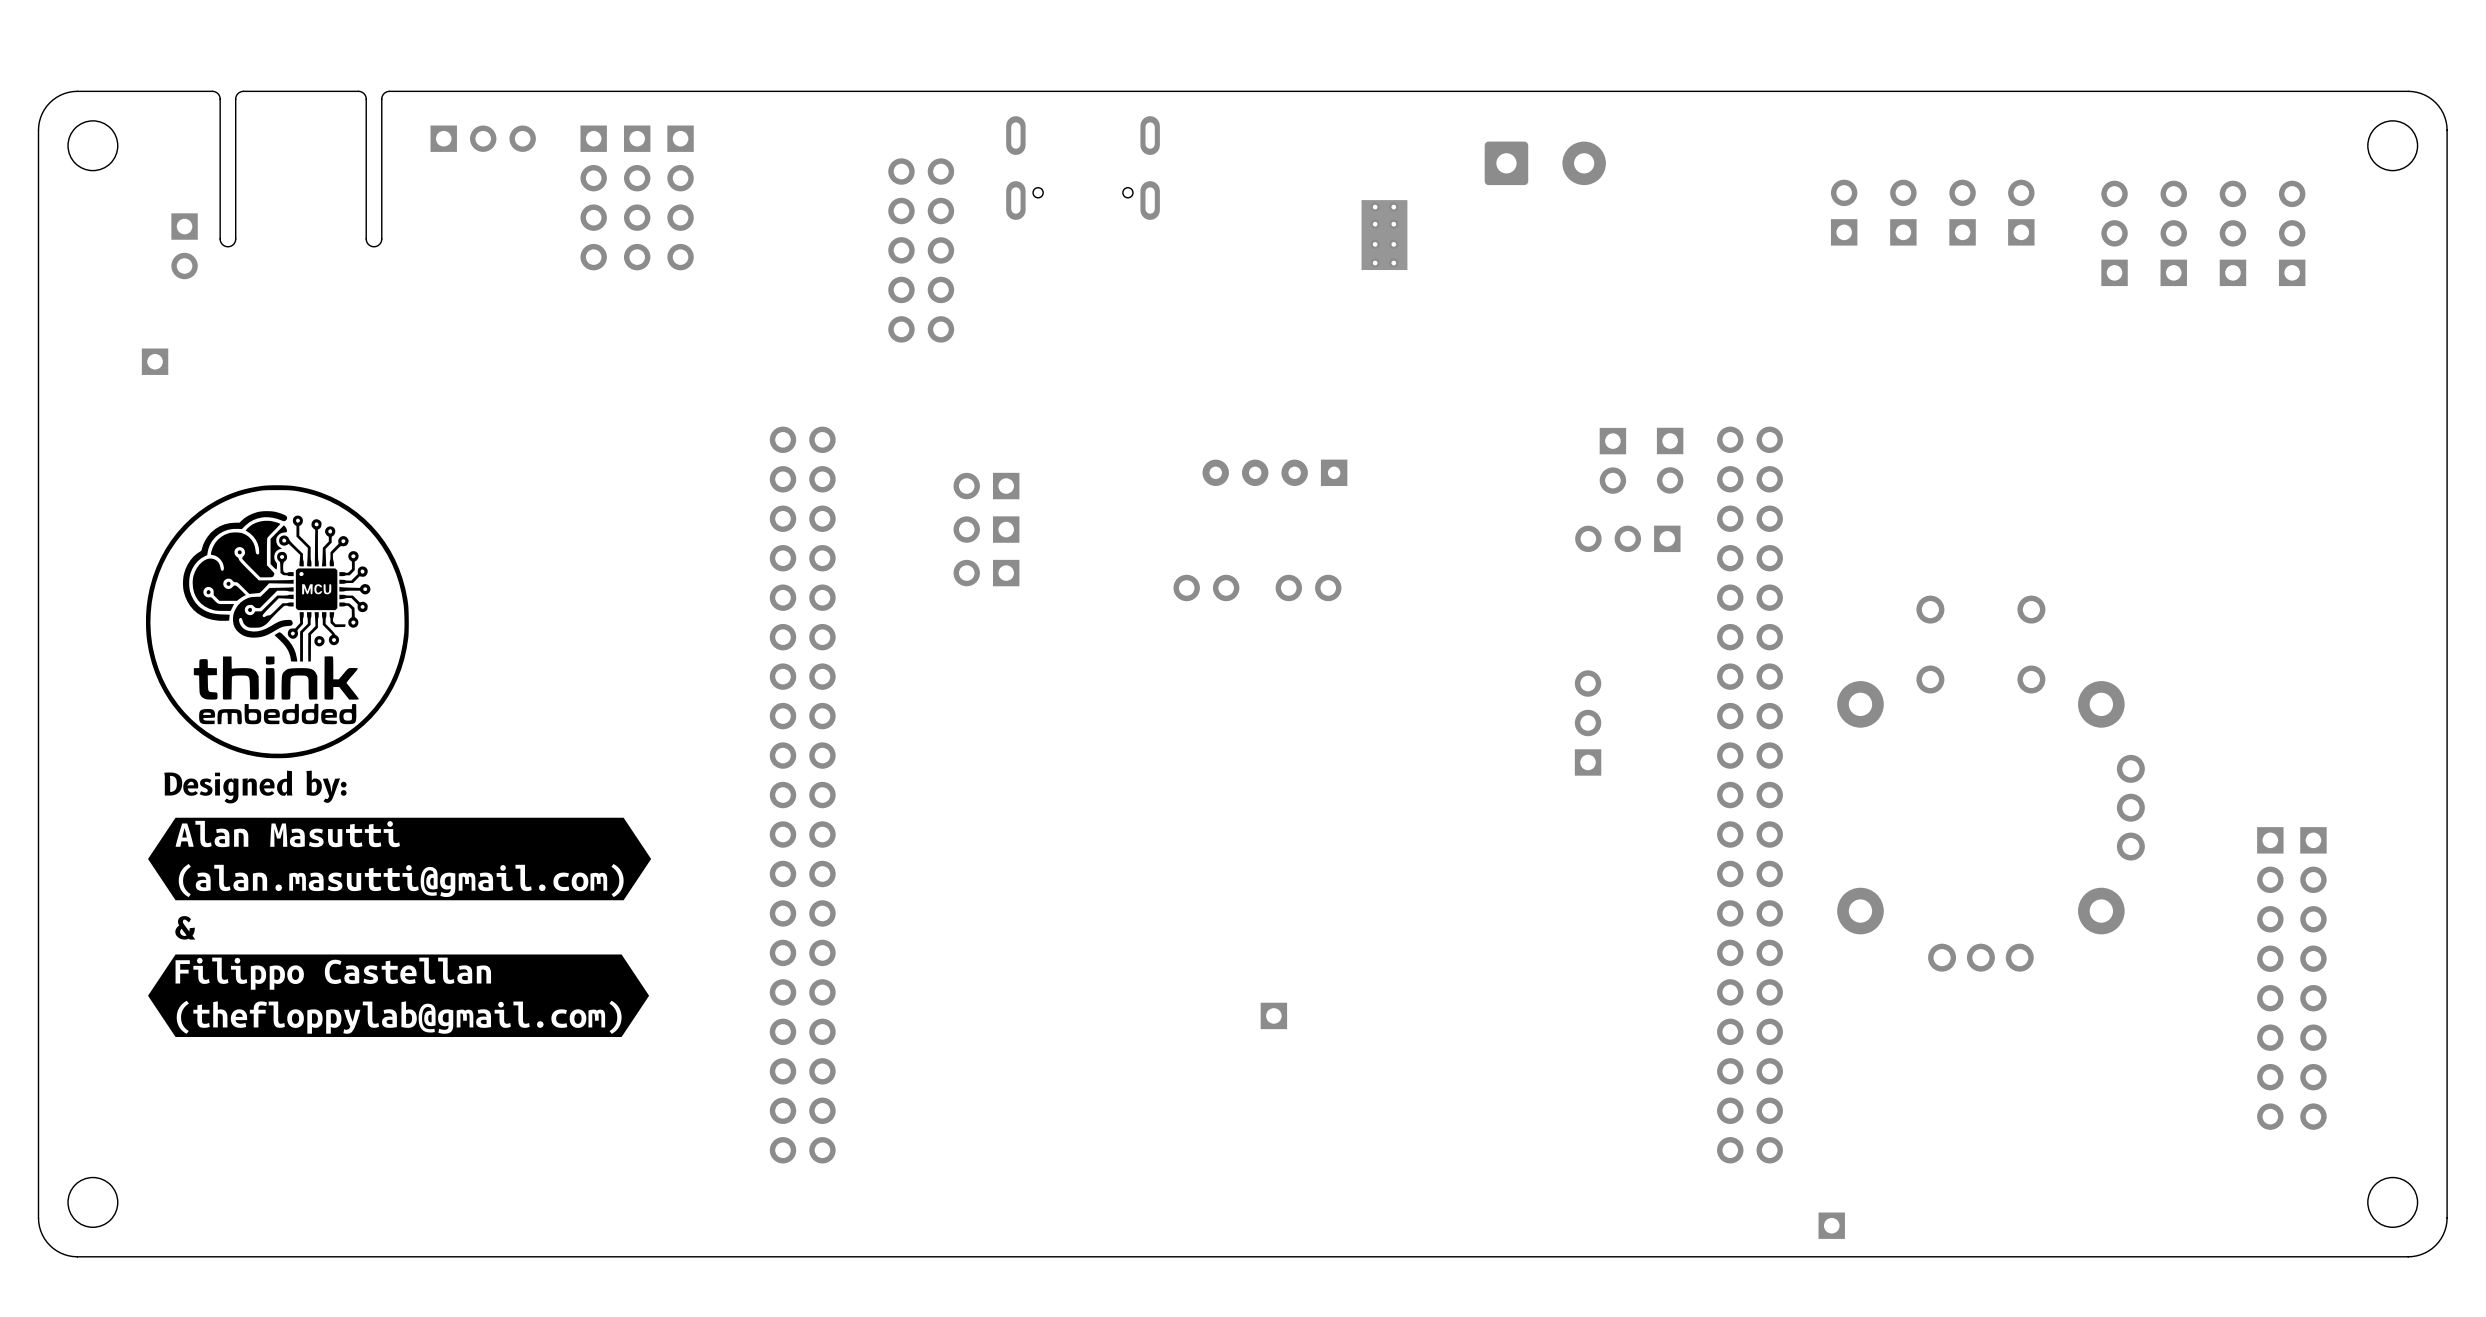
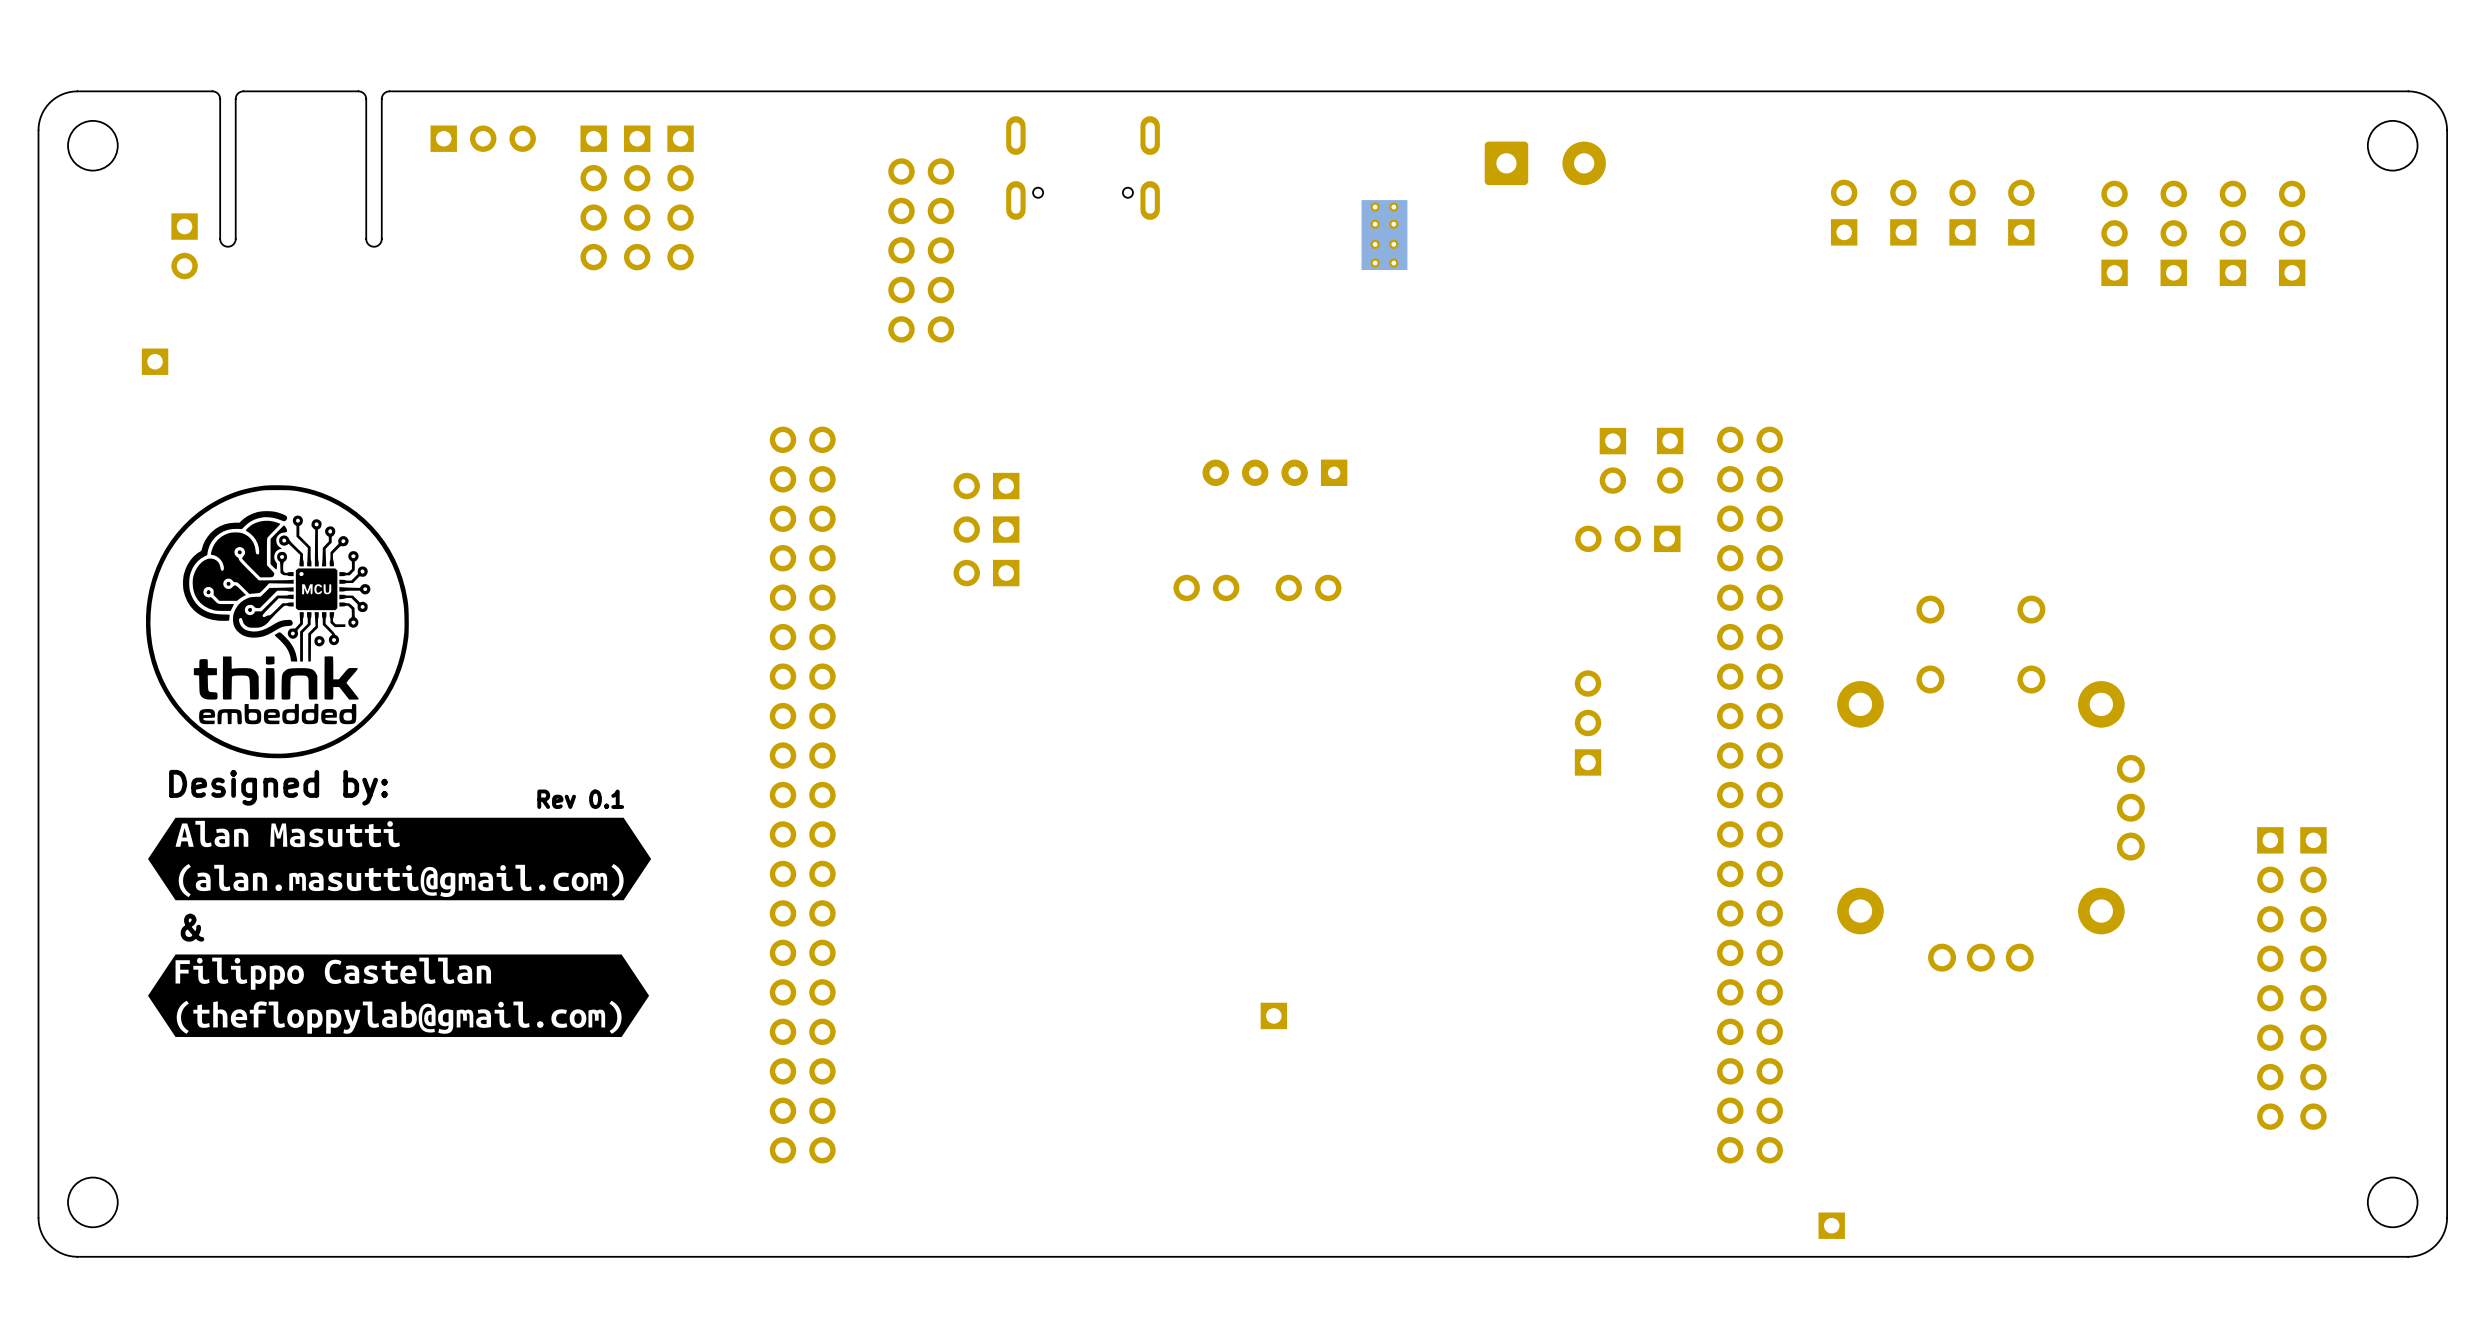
text: none -> Rev 0.1 (580, 799)

